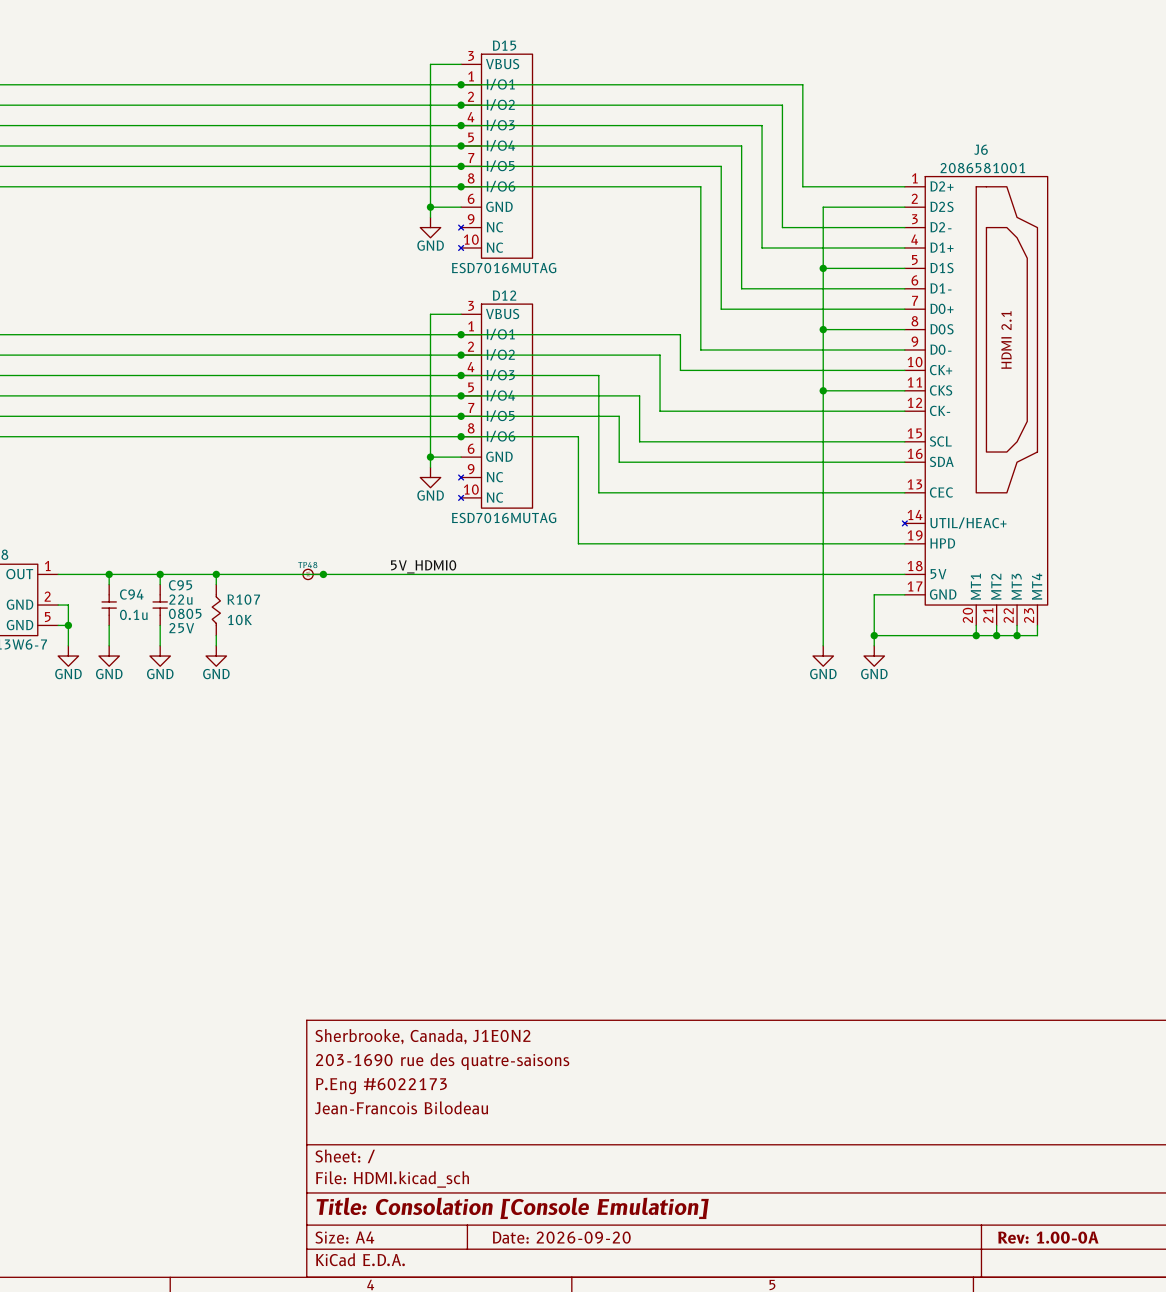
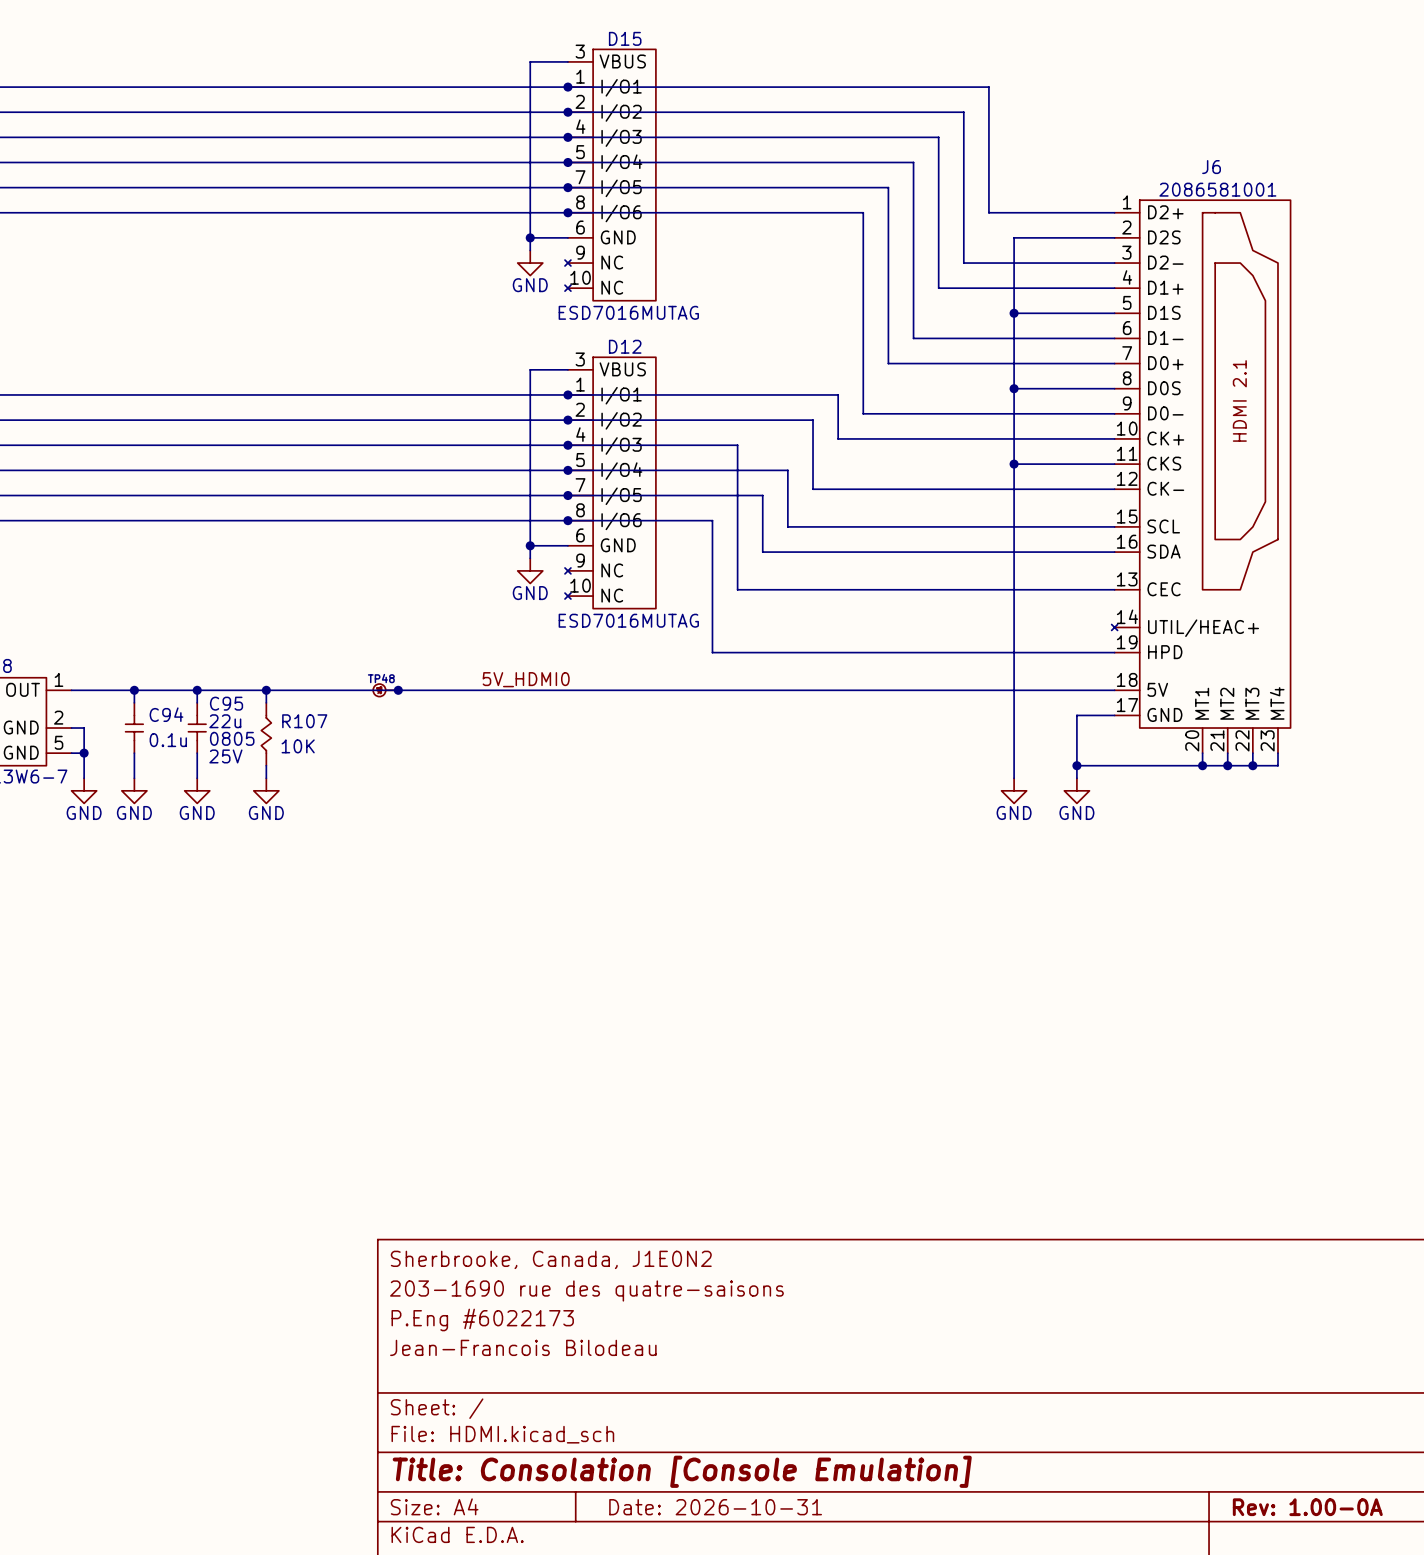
title block: Date: 2026-09-20 (561, 1237) -> Date: 2026-10-31 (715, 1507)

